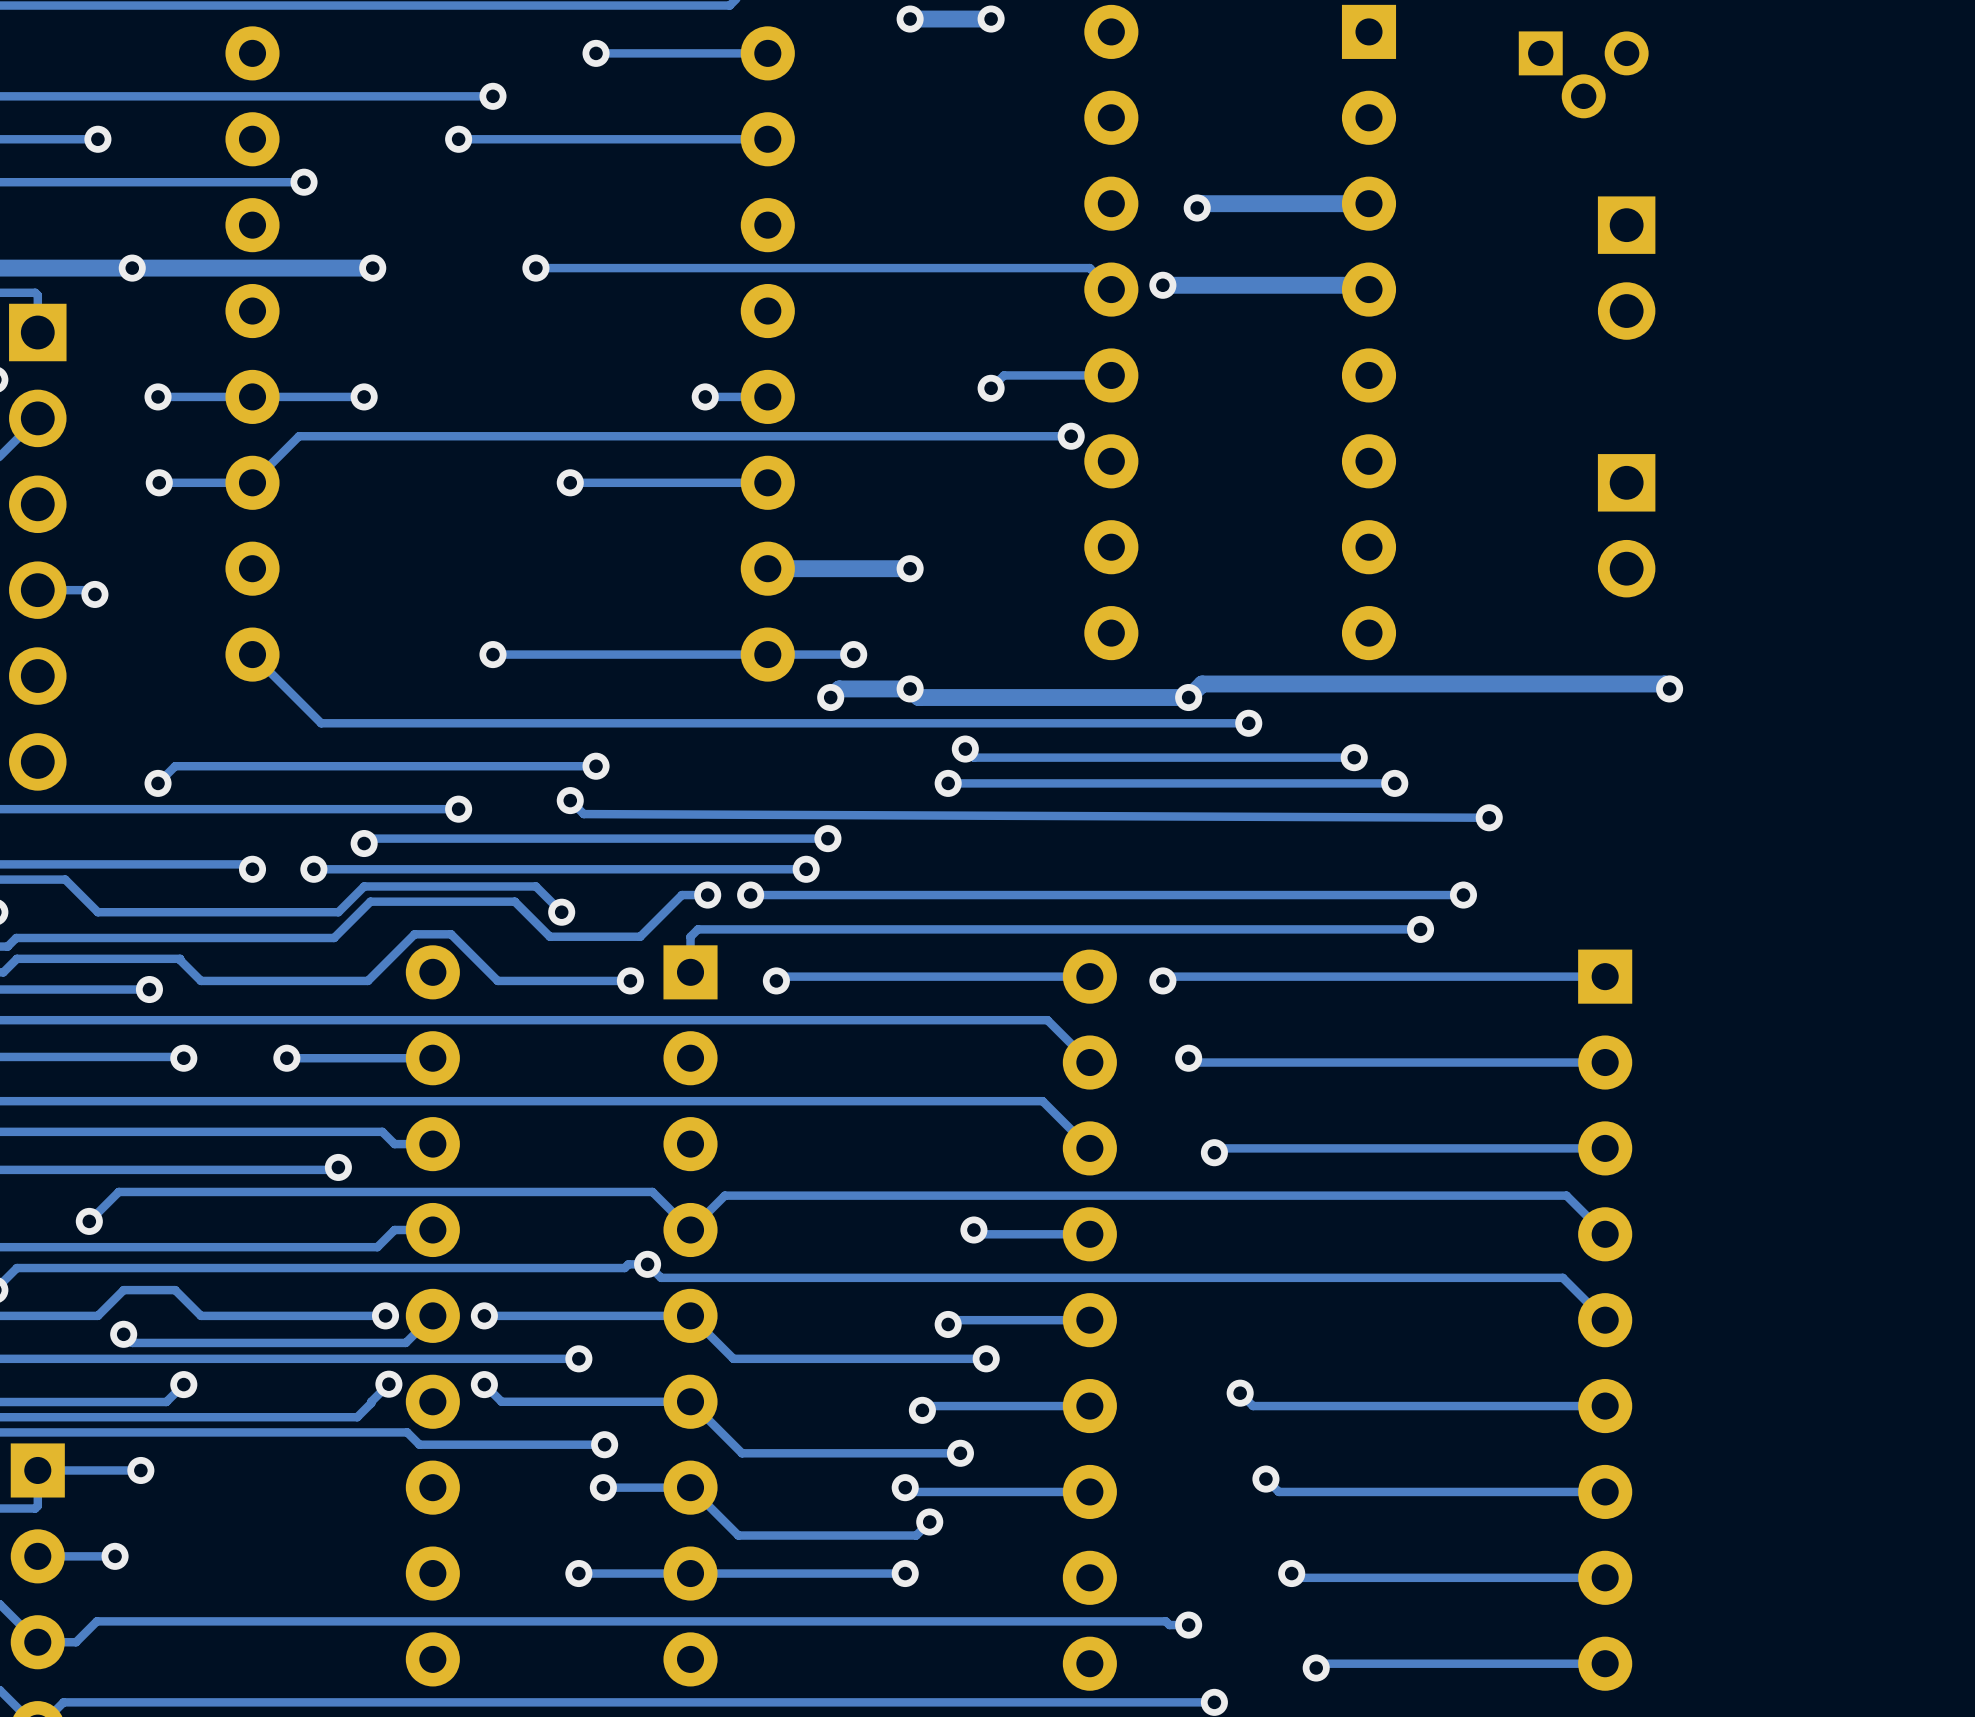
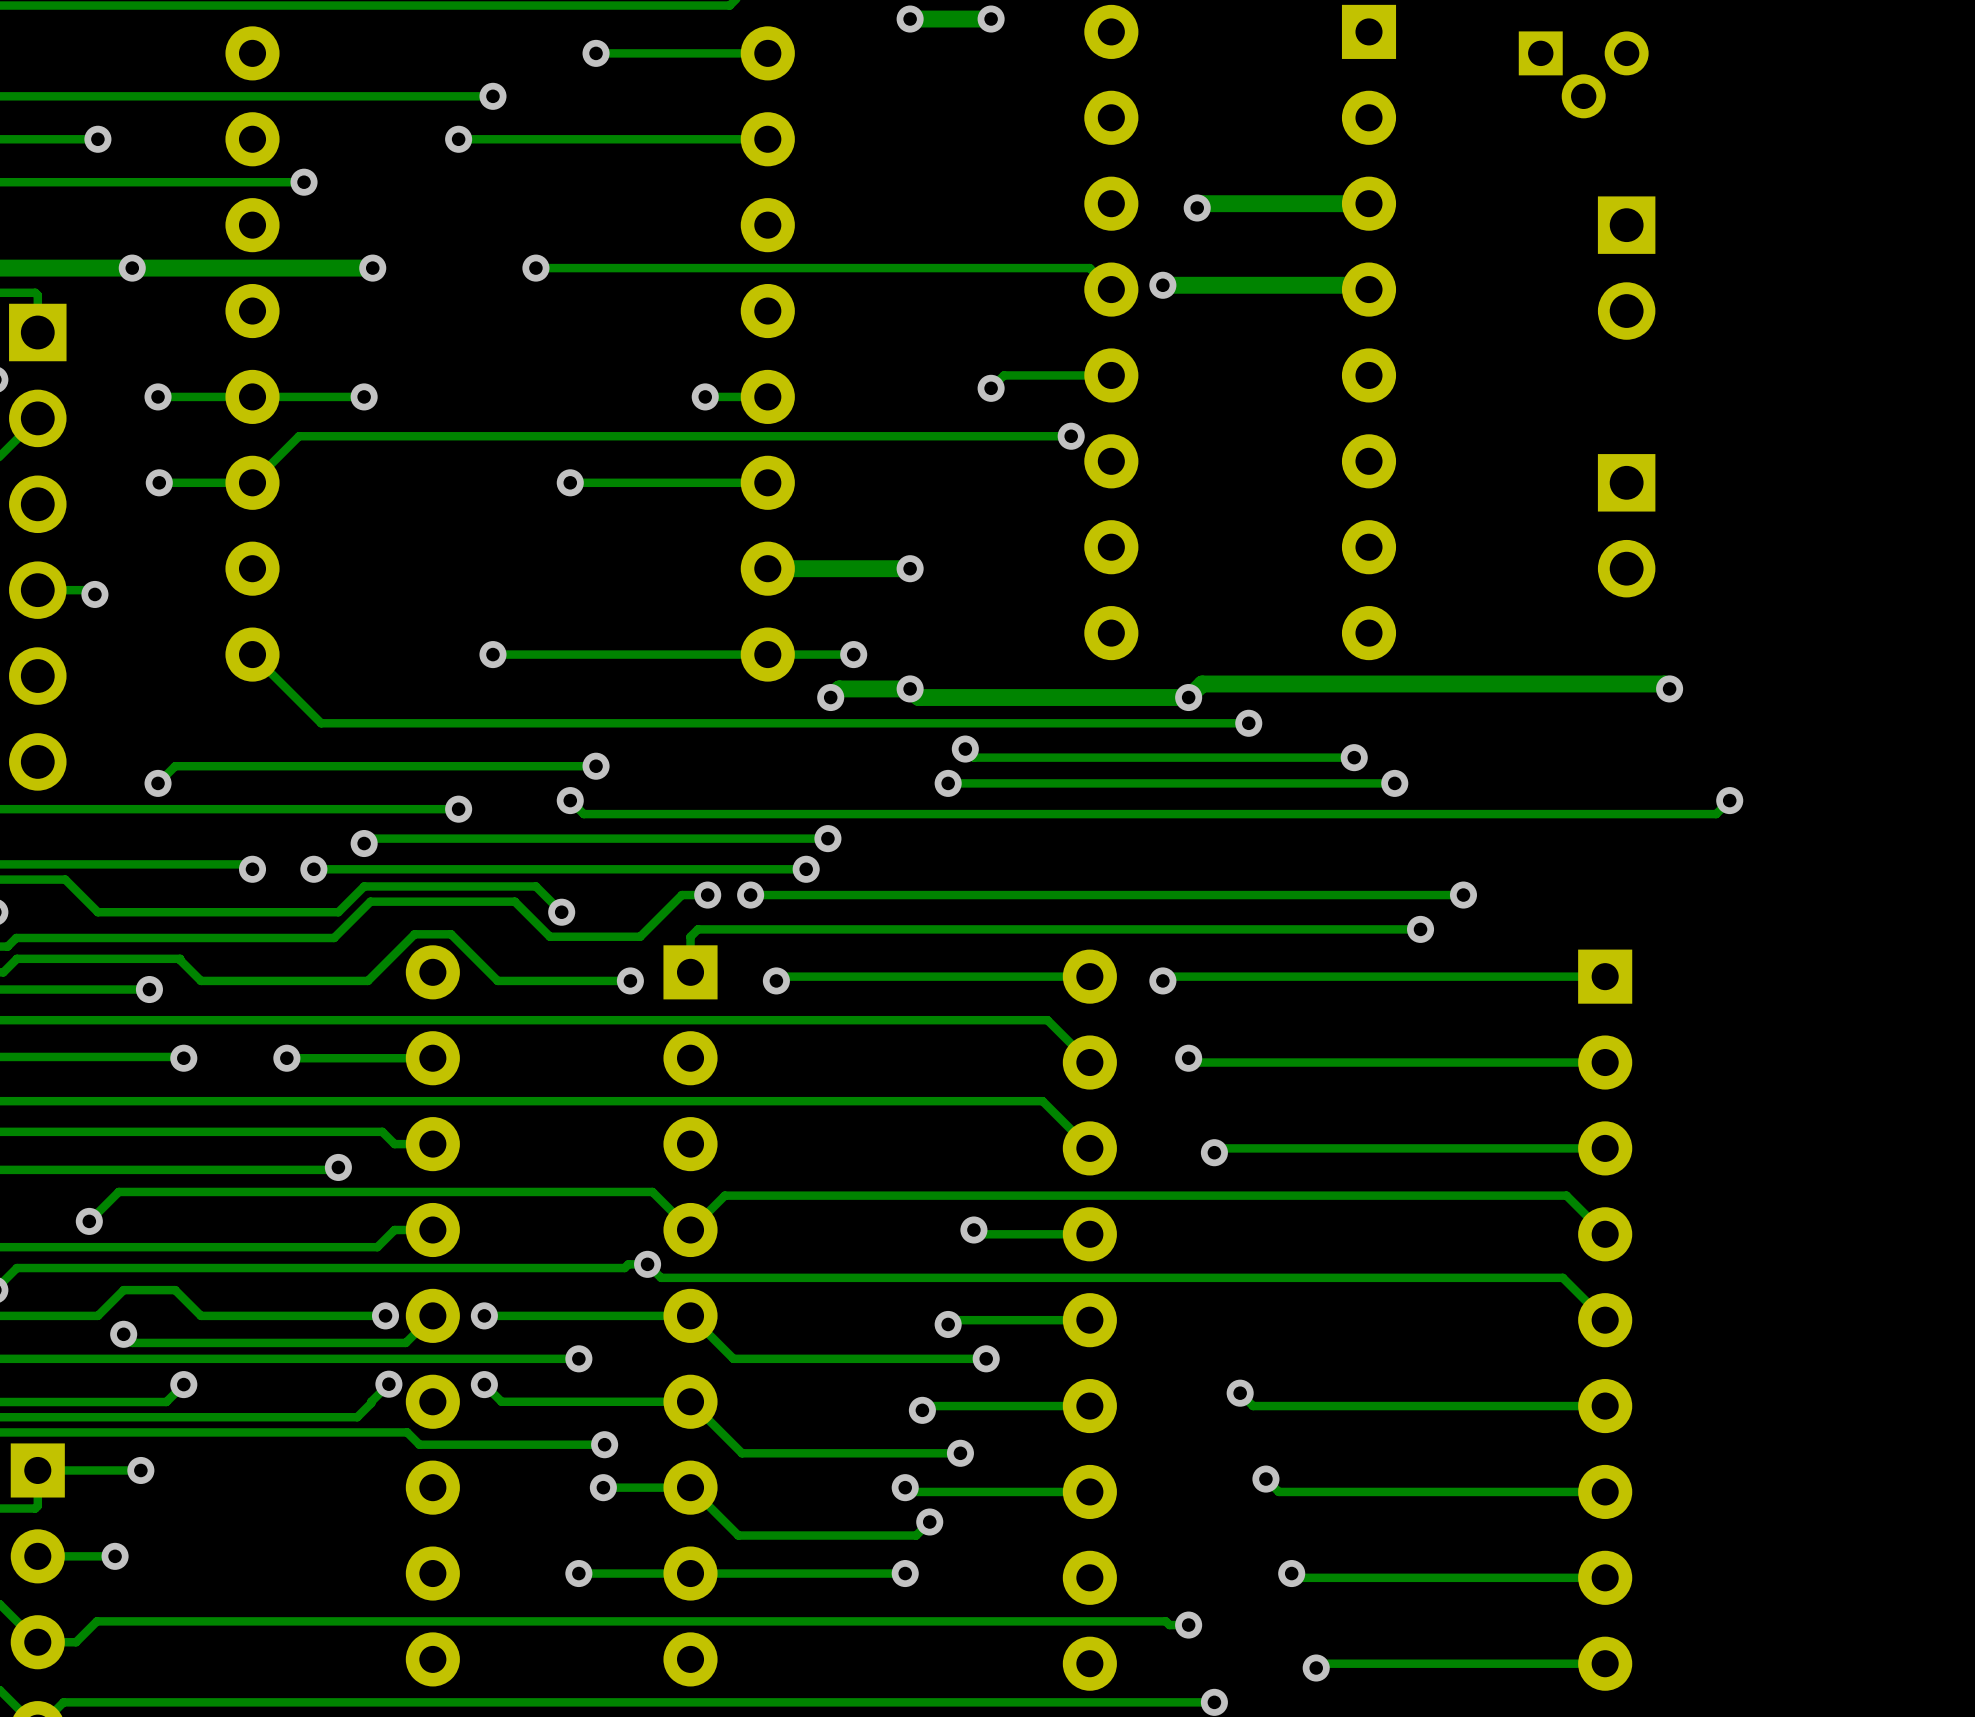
via: none -> (1729, 800)
track: (583, 814) (1489, 817) -> (583, 814) (1716, 814) (1729, 800)
via: (1489, 817) -> none

